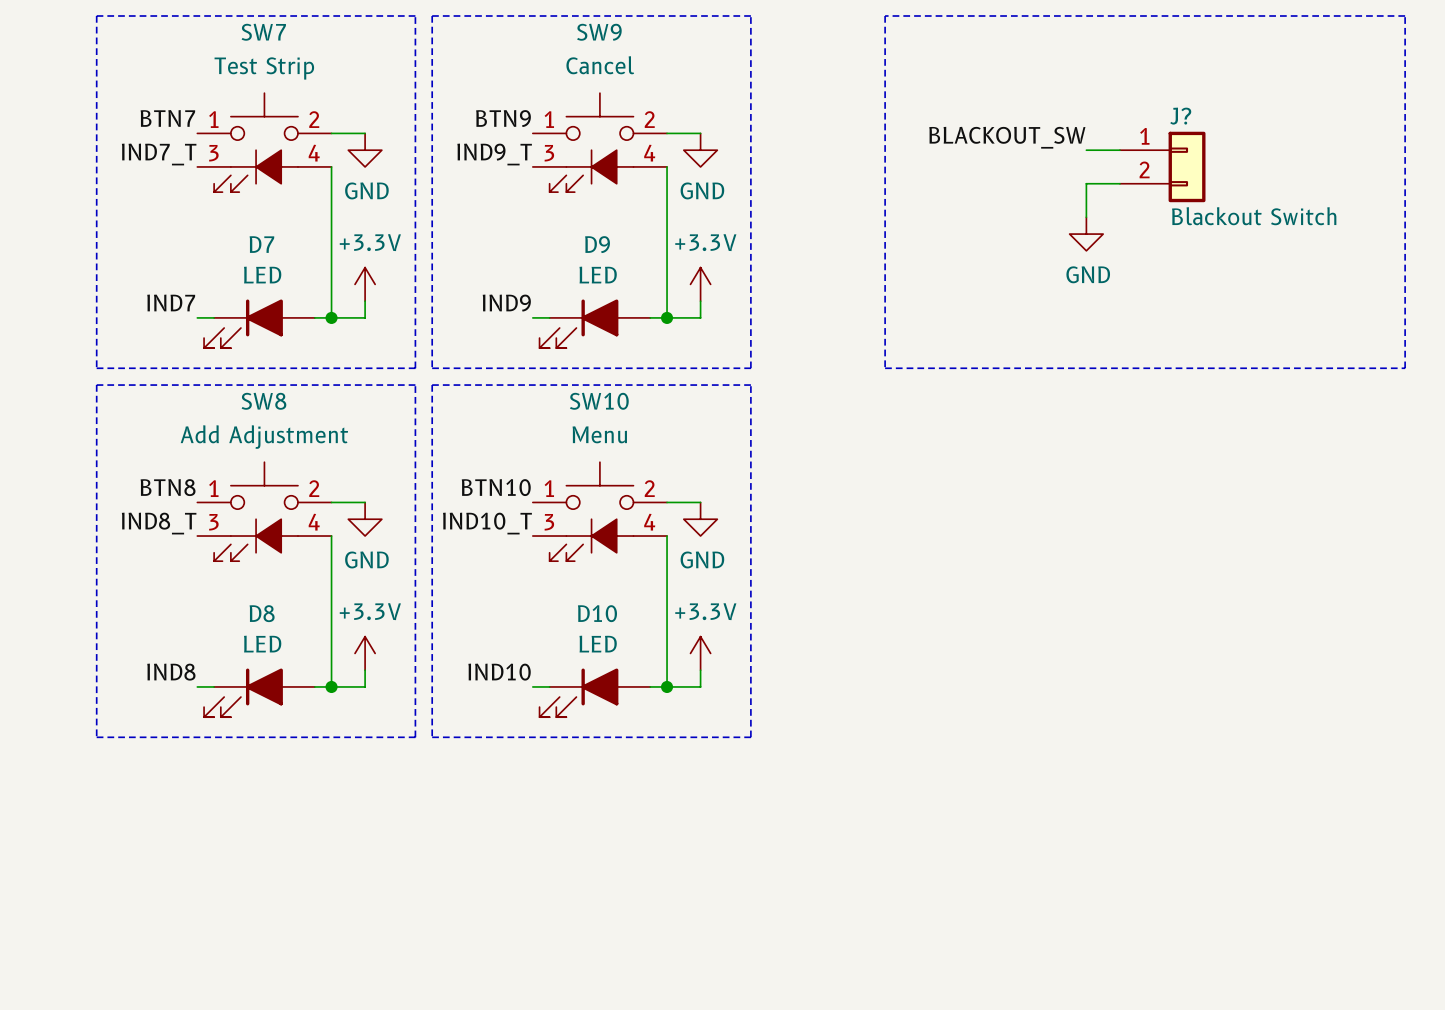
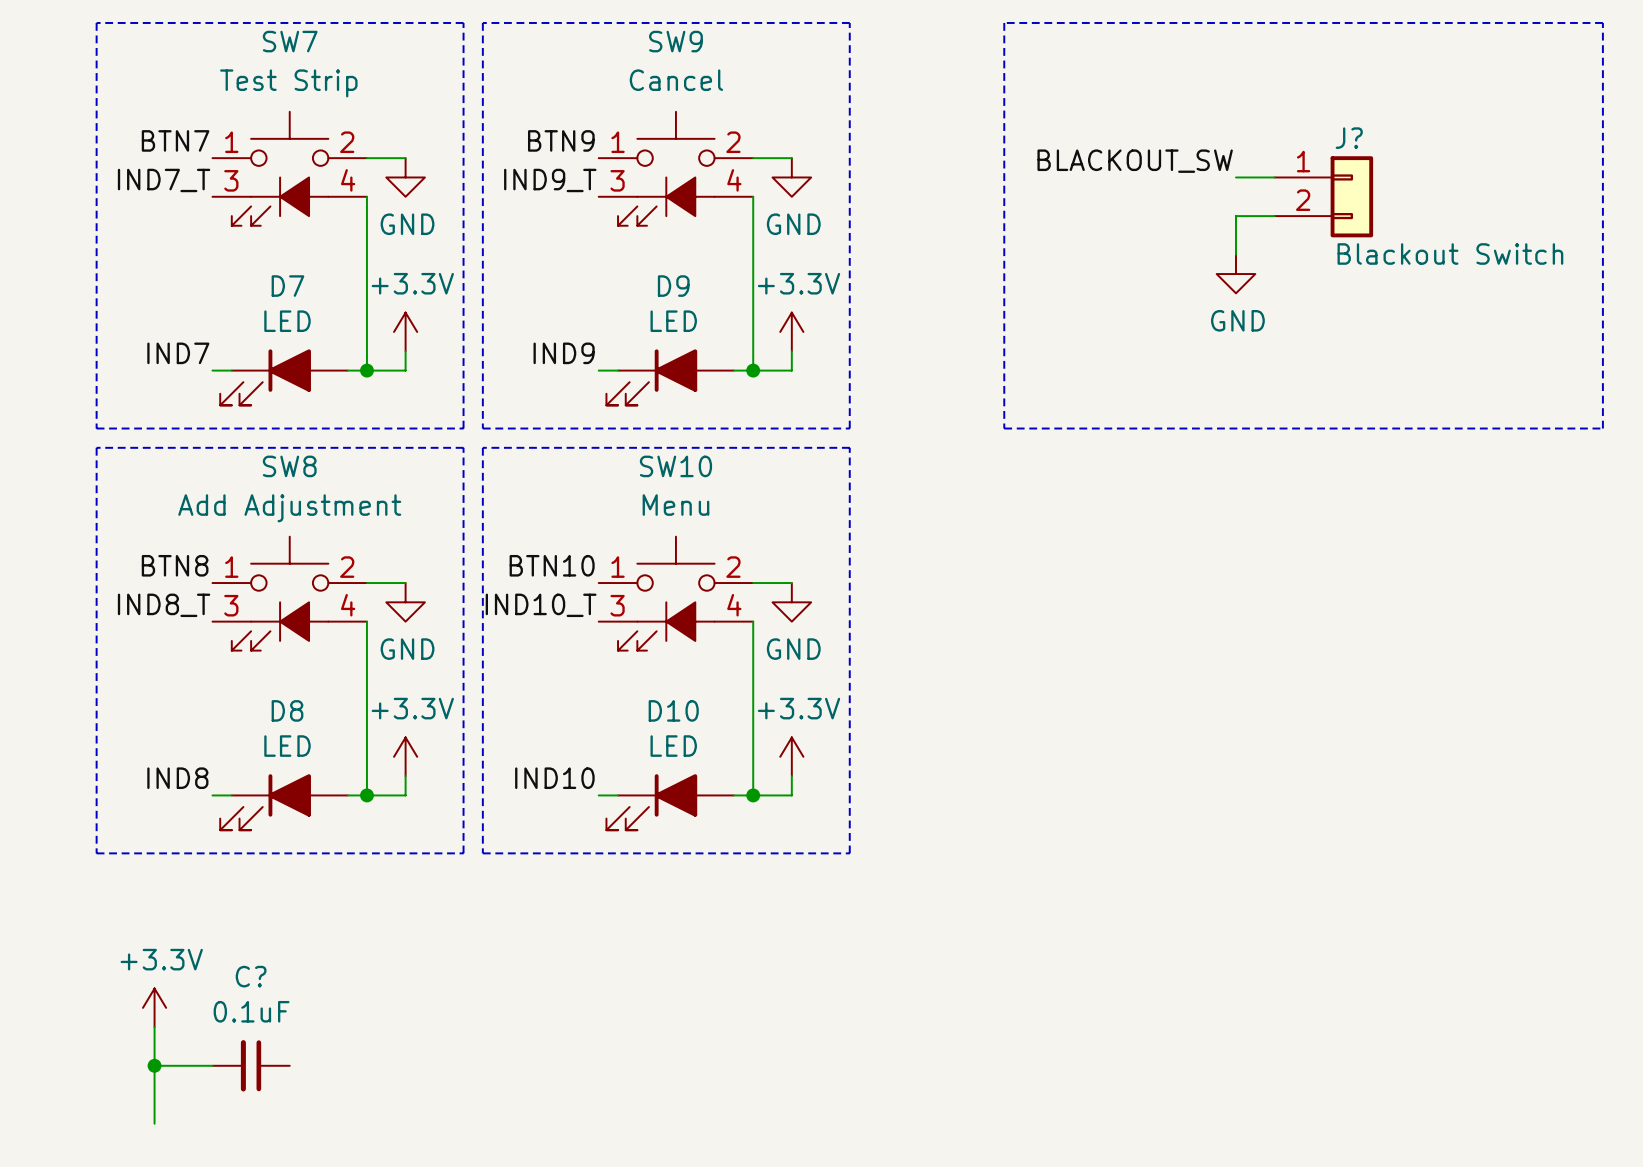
power symbol: none -> +3.3V (154, 1007)
wire: none -> (154, 1027) (154, 1123)
wire: none -> (154, 1065) (212, 1065)
junction: none -> (154, 1065)
C?: none -> 0.1uF (251, 1065)

